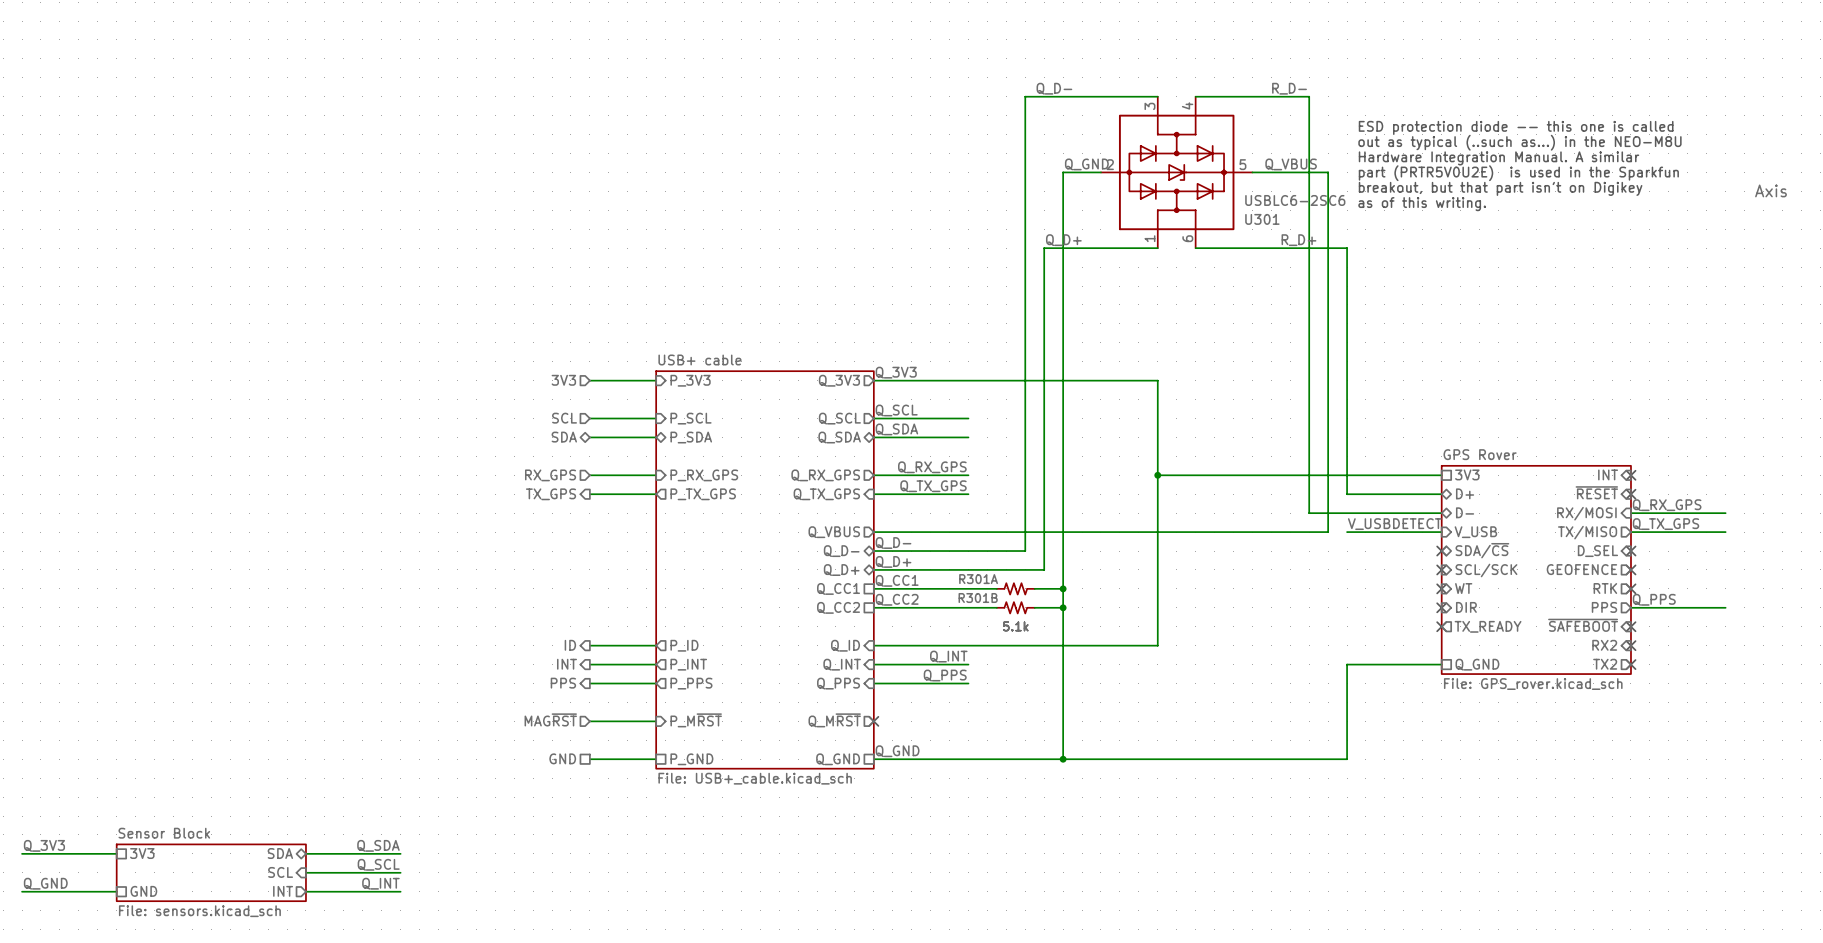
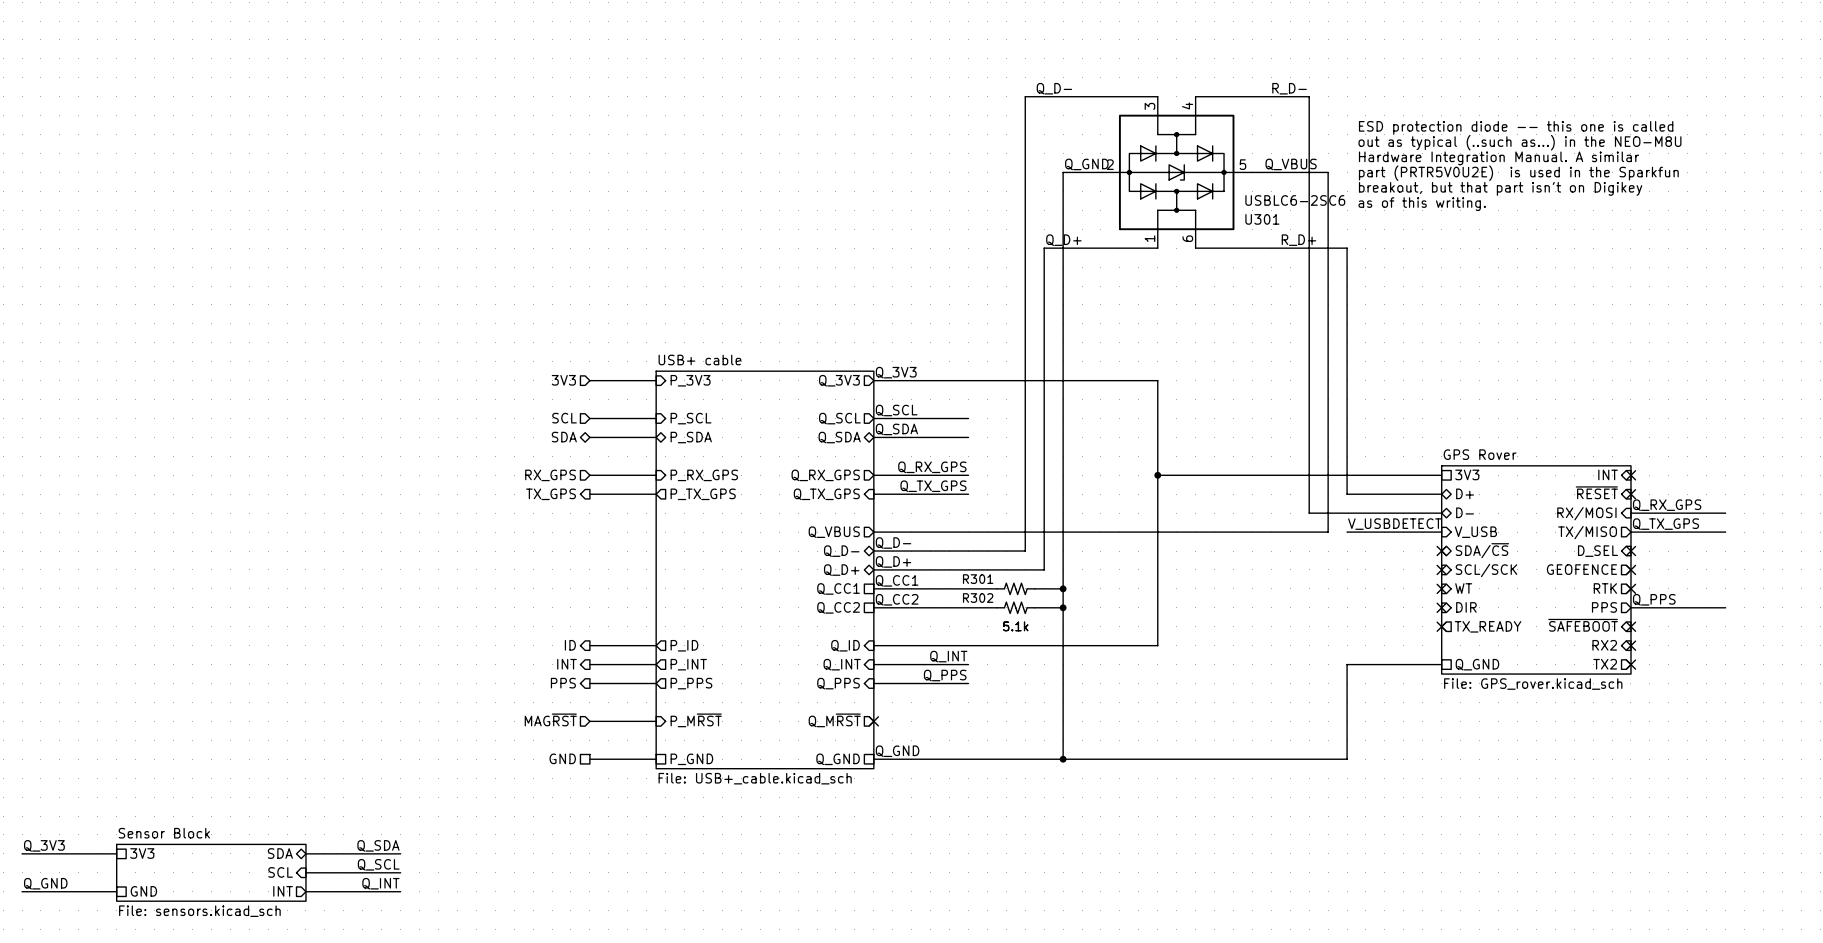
part: Axis (1771, 190) -> none
R301A name: R301A (978, 579) -> R301 (978, 579)
R301B name: R301B (978, 598) -> R302 (978, 598)

